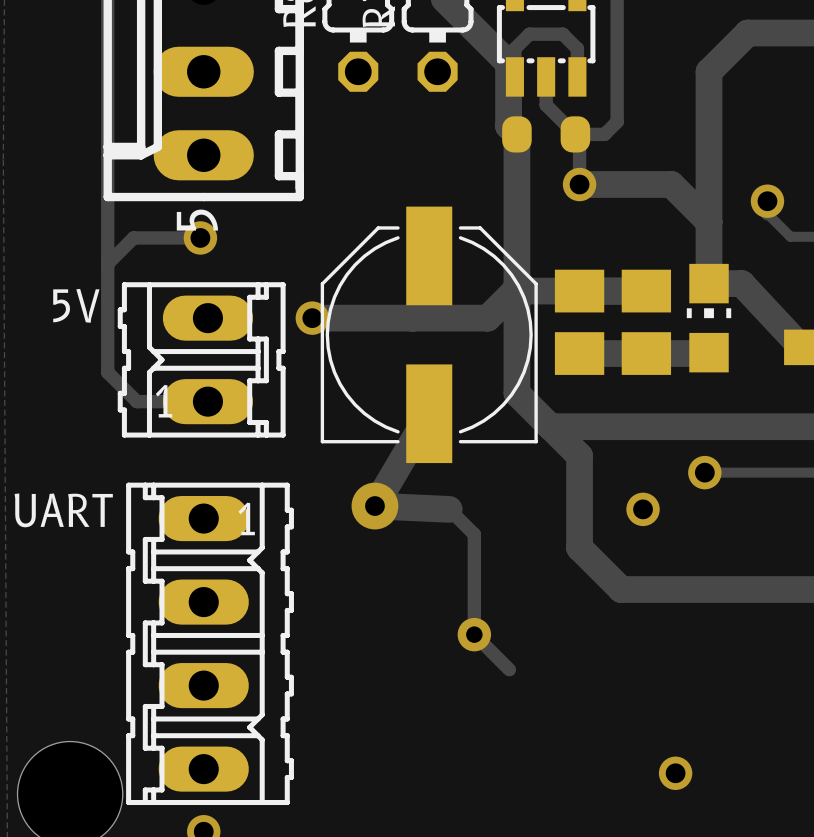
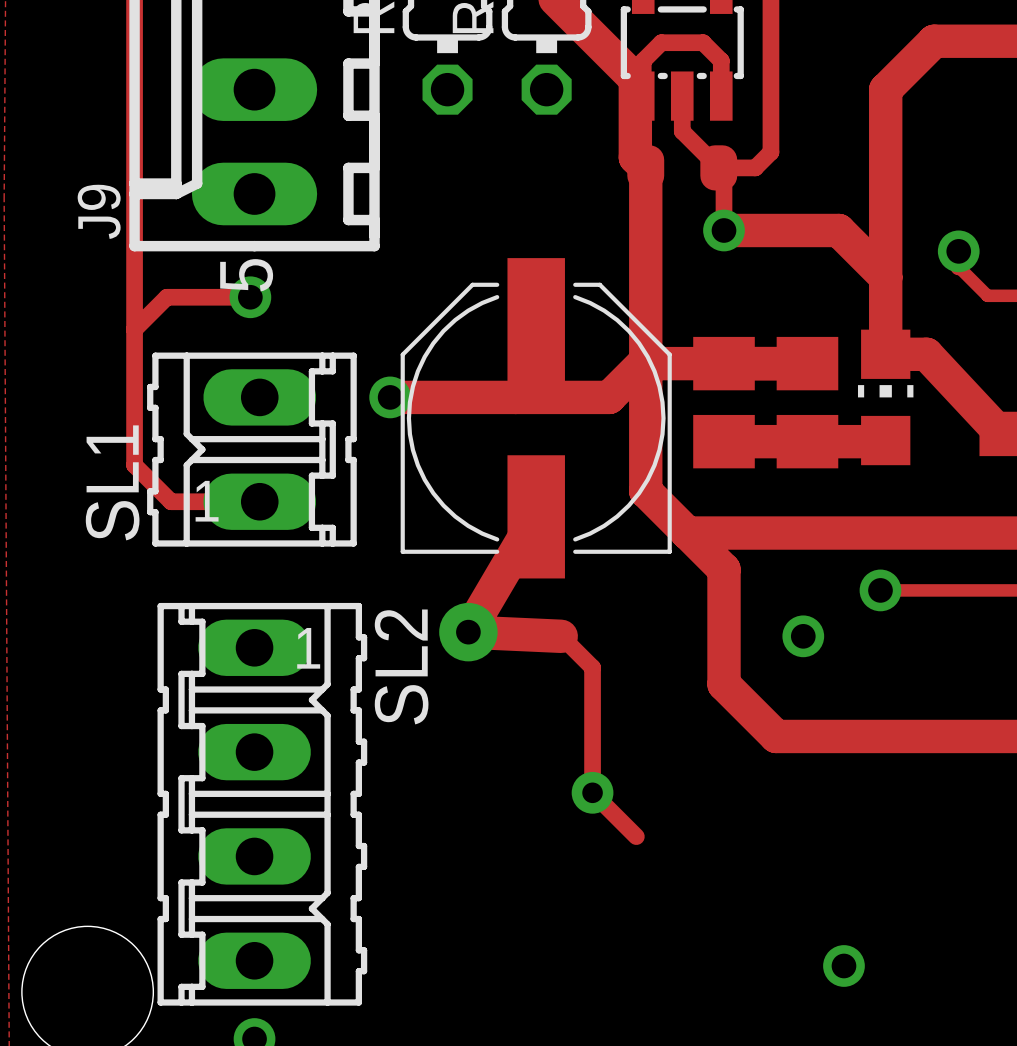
J9 name: none -> J9 (99, 211)
text: 5V (76, 305) -> none
SL1 name: none -> SL1 (112, 482)
text: UART (63, 510) -> none
SL2 name: none -> SL2 (401, 666)

